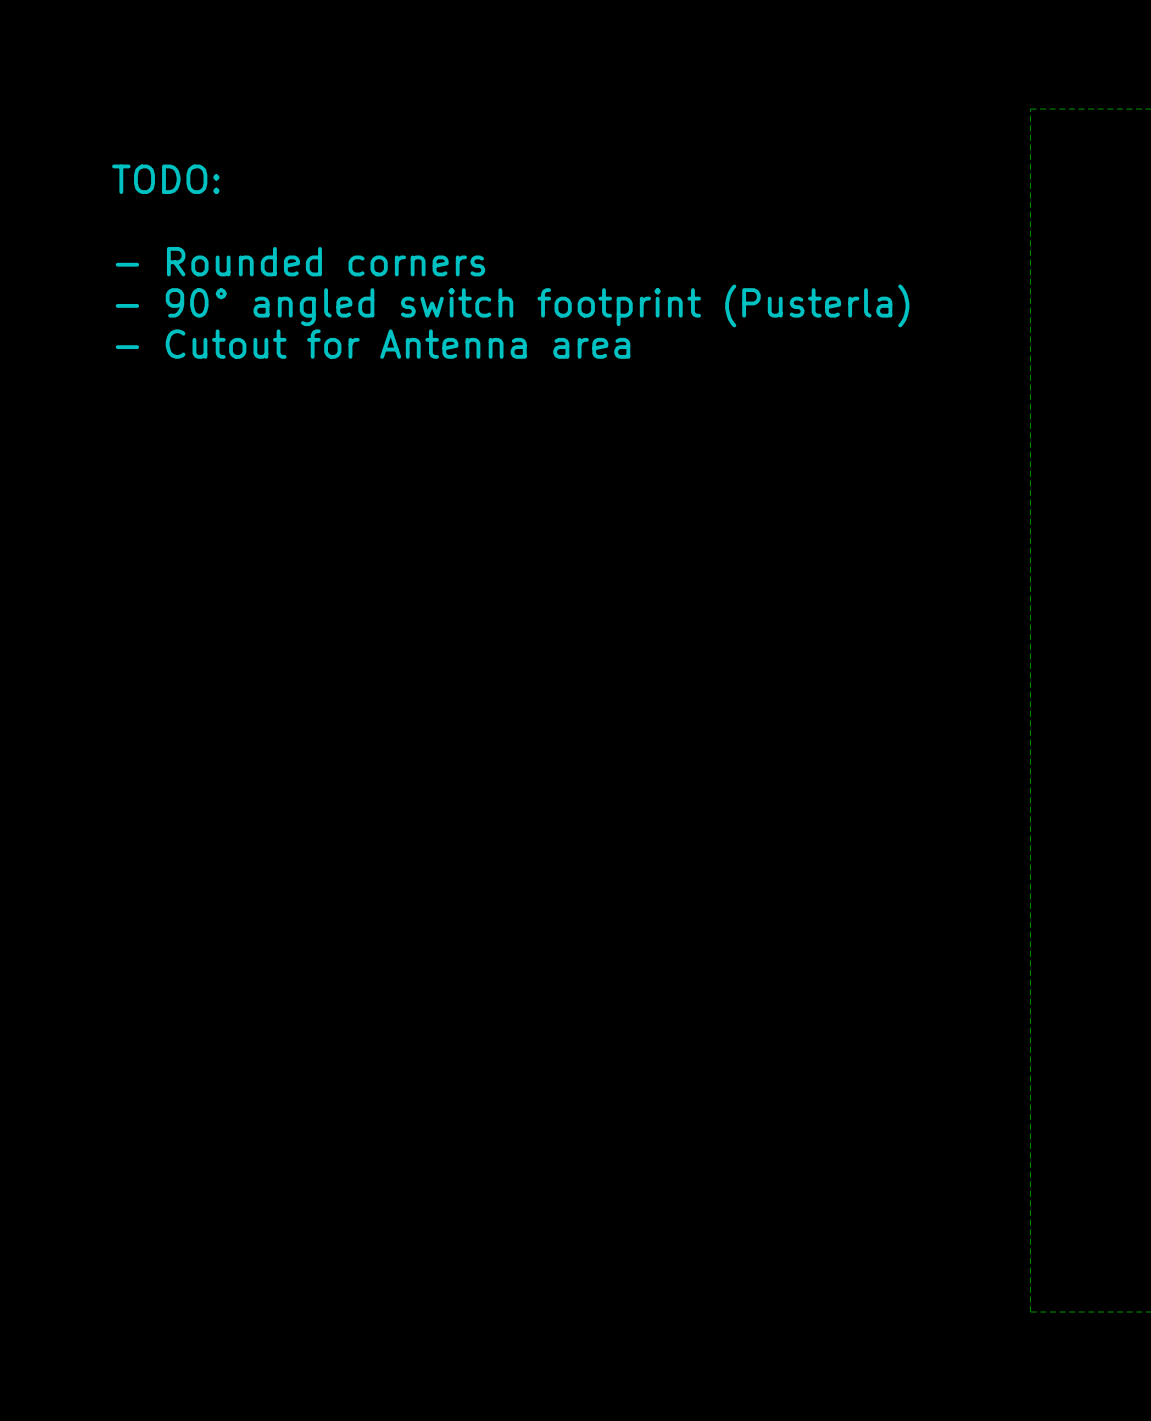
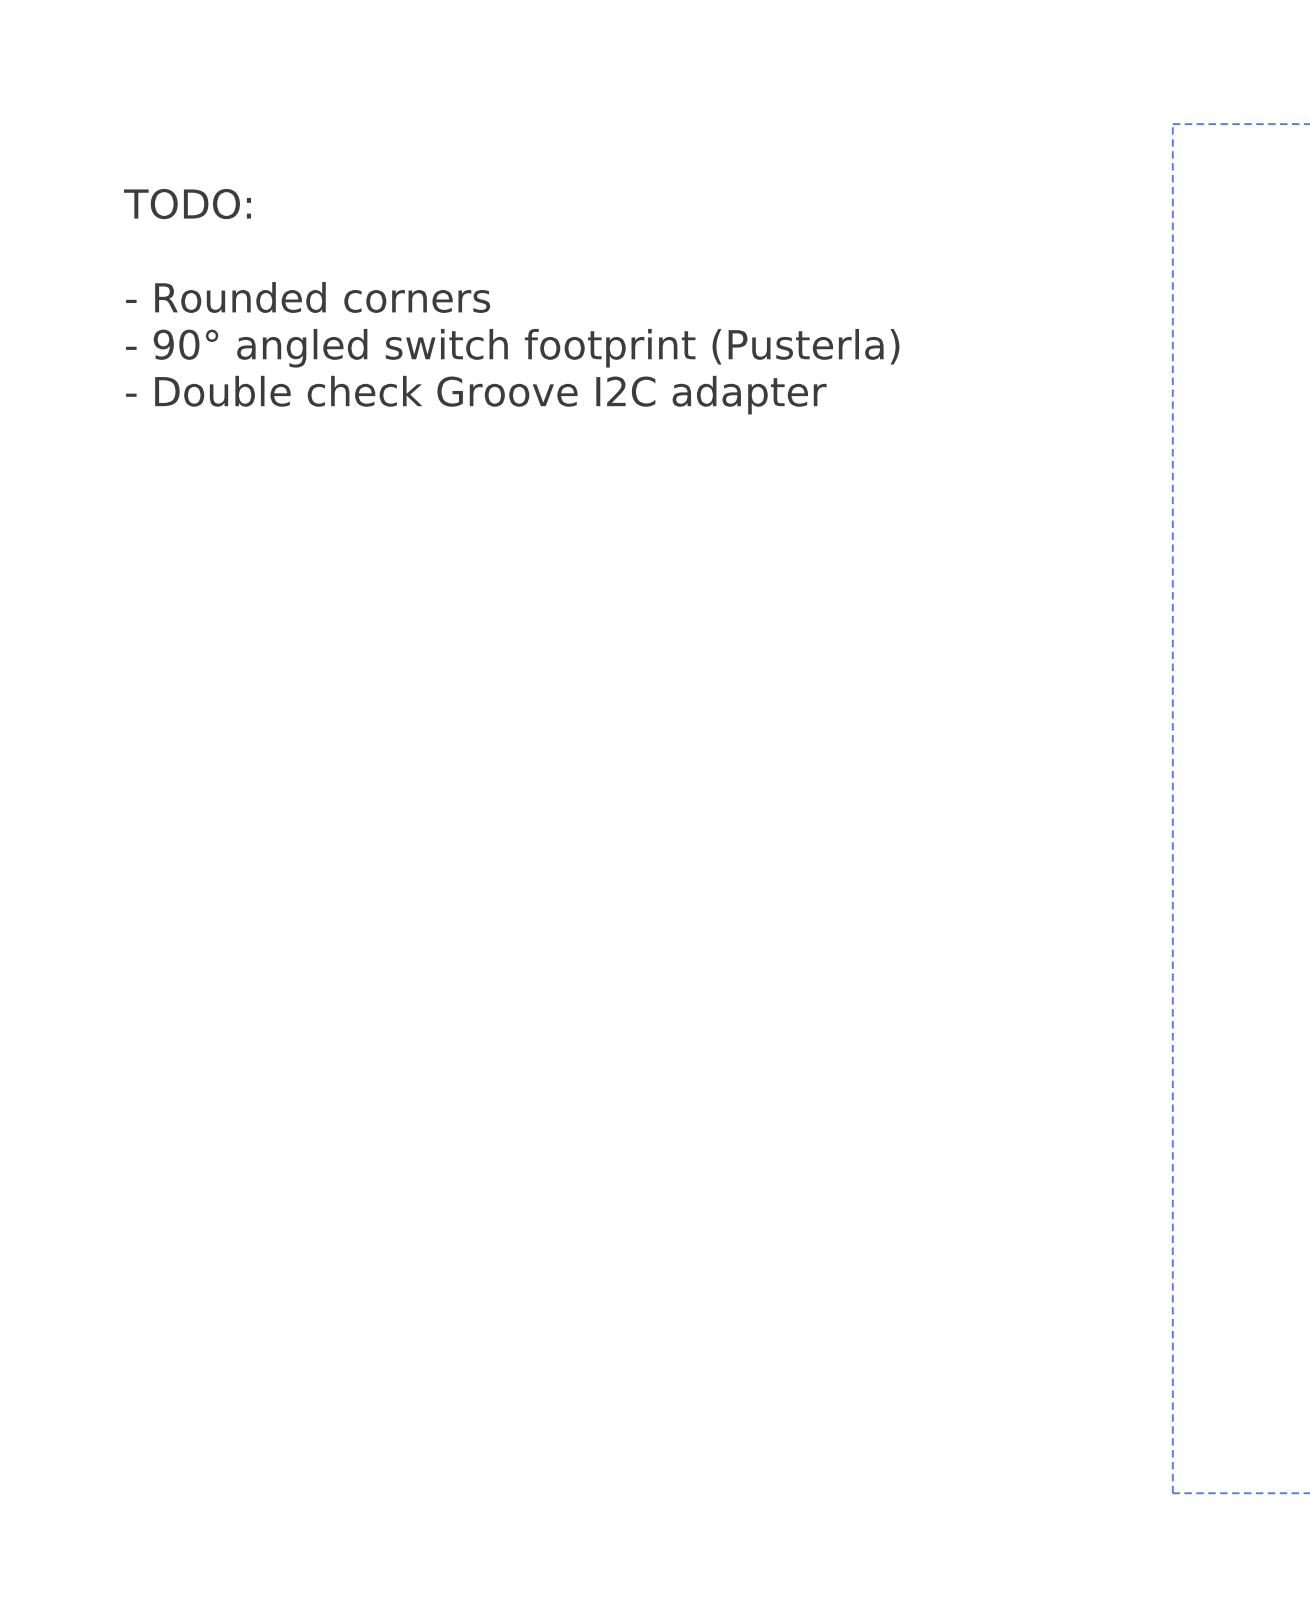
text: - Cutout for Antenna area (373, 344) -> - Double check Groove I2C adapter (476, 395)

